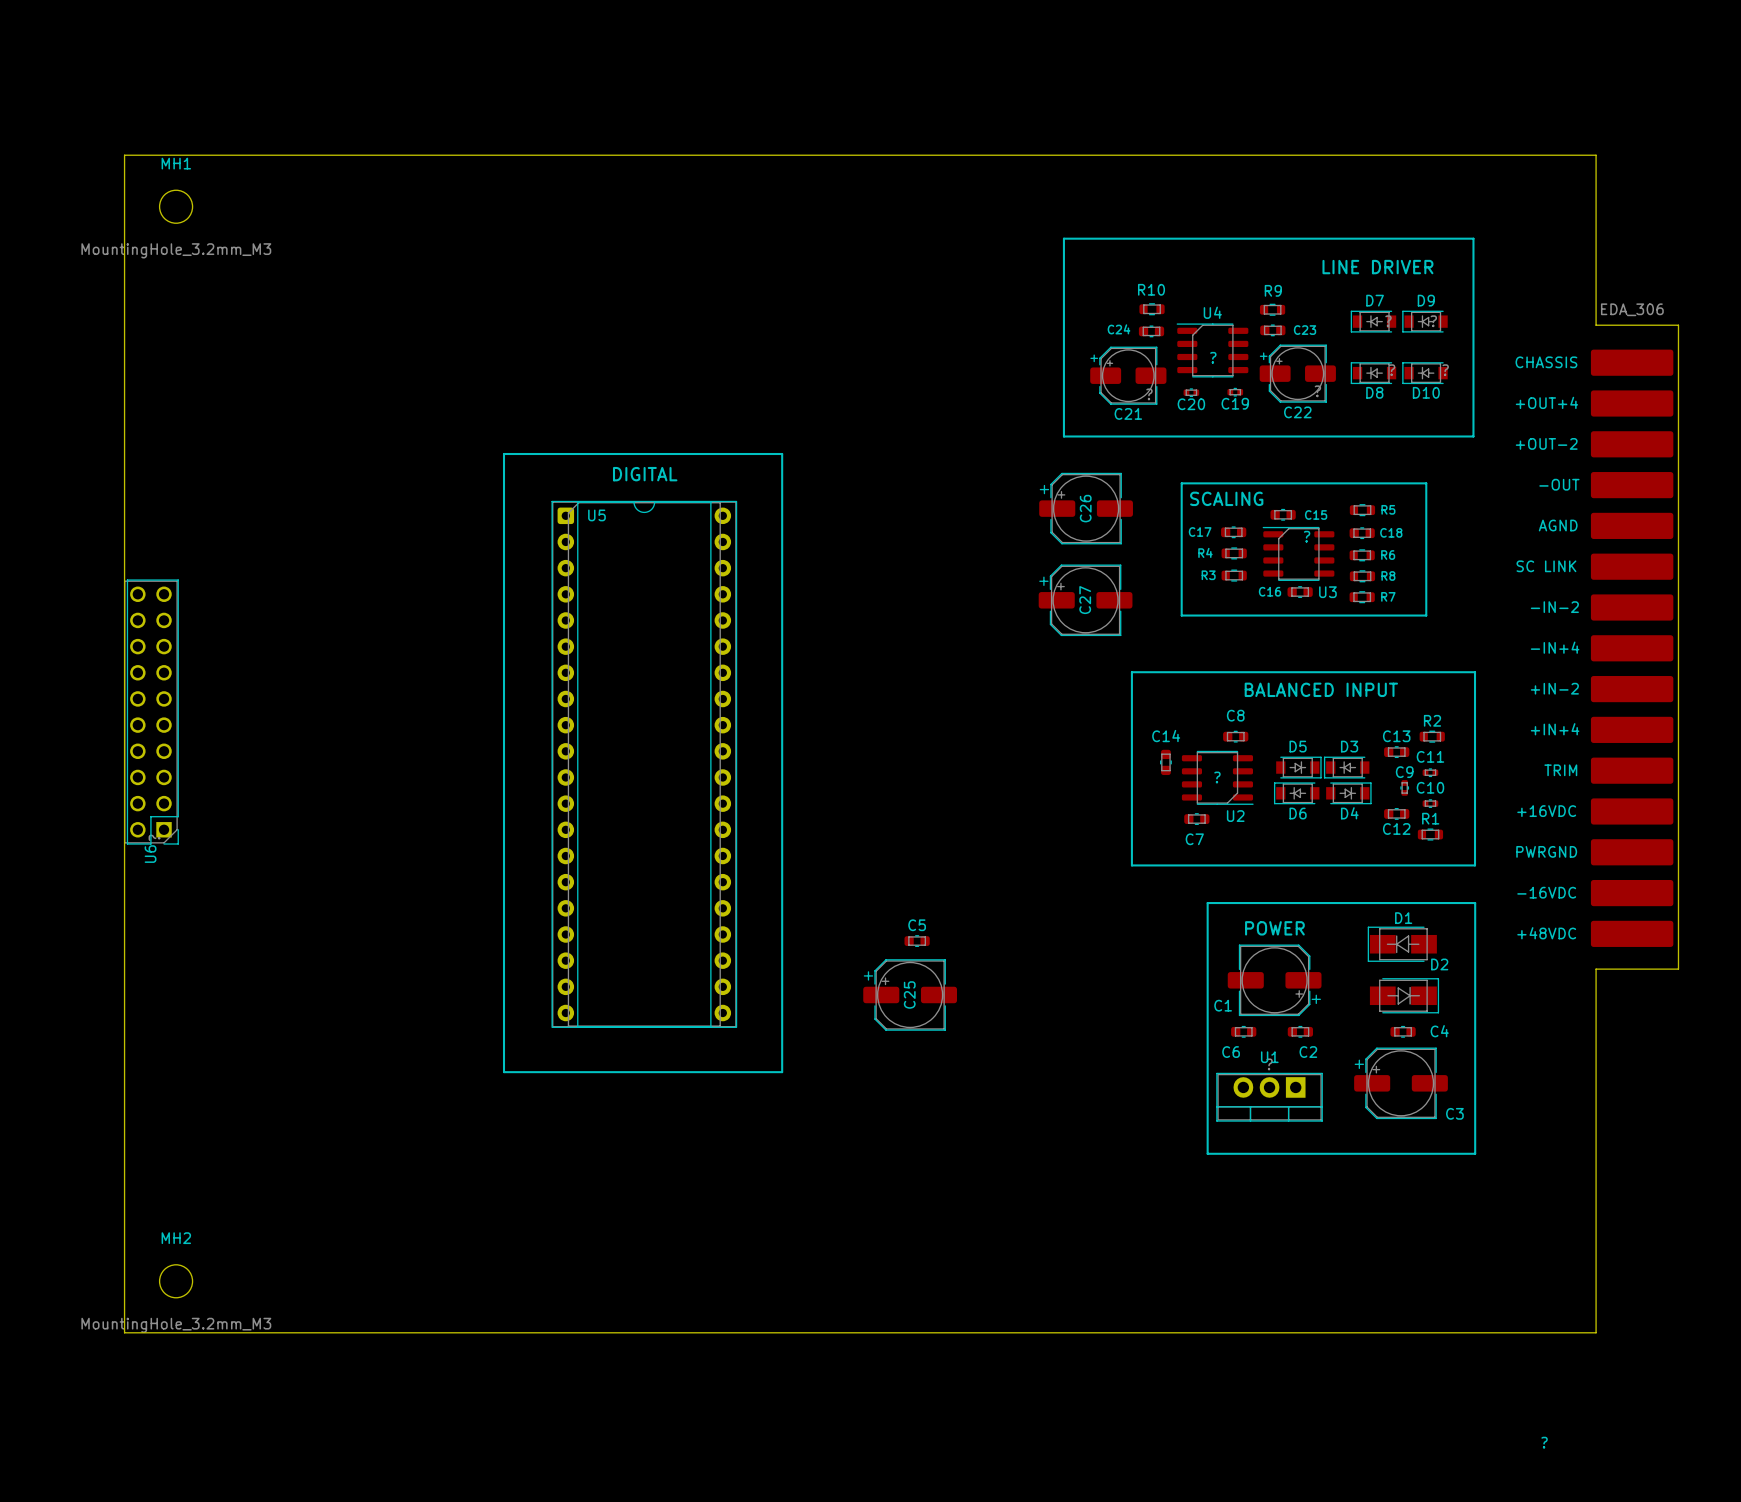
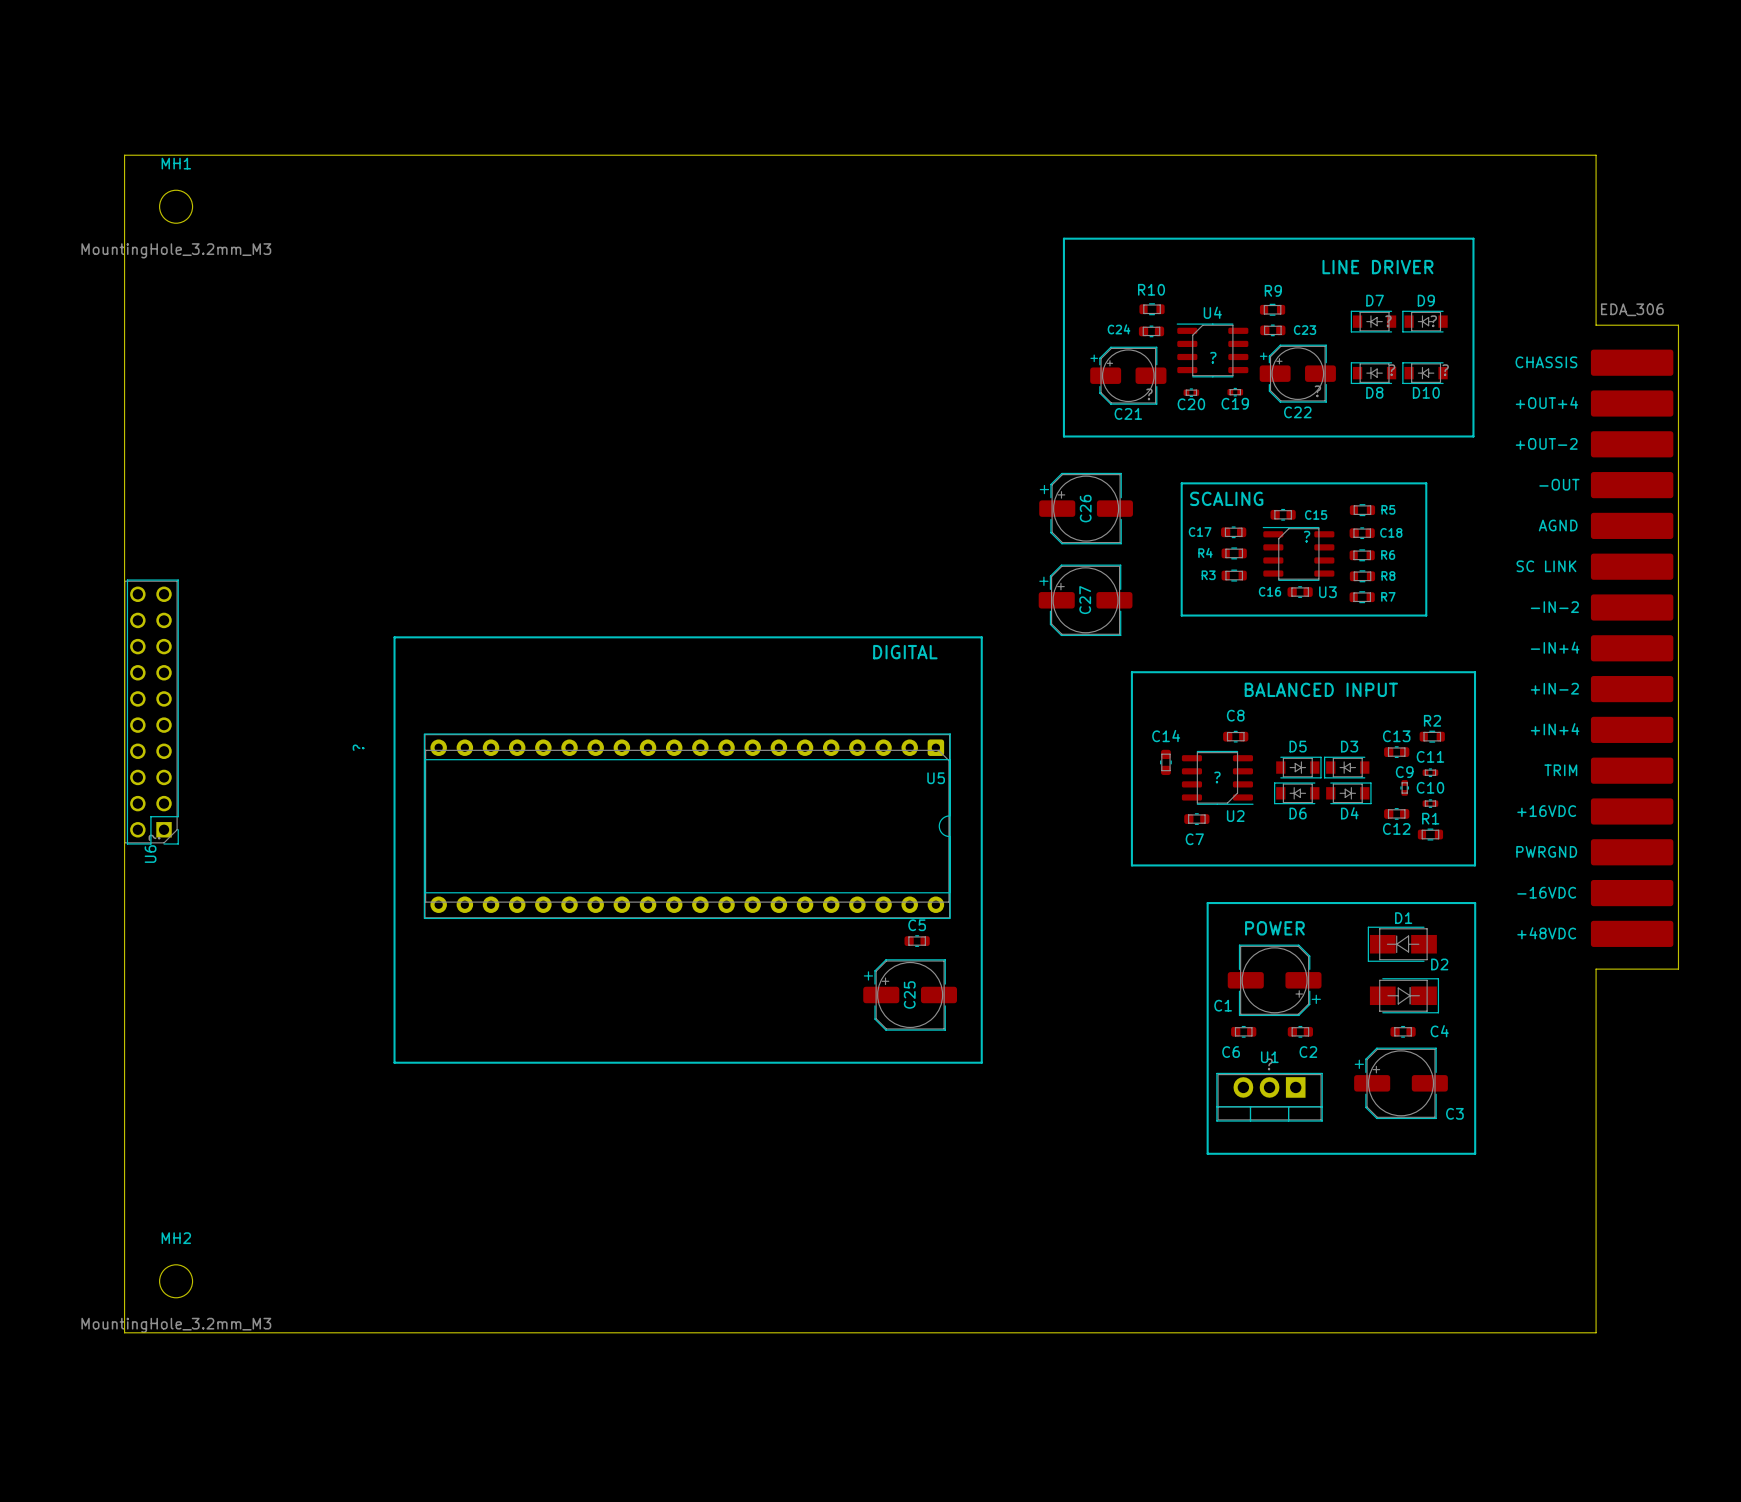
line: (504, 454) (782, 454) (782, 1072) (504, 1072) (504, 454) -> none
text: DIGITAL (645, 474) -> none
line: none -> (394, 637) (981, 637) (981, 1062) (394, 1062) (394, 637)
text: none -> DIGITAL (905, 652)
U5 rotation: 0° (644, 764) -> 90° clockwise (687, 826)
U5 value position: ? (1544, 1442) -> ? (358, 747)

